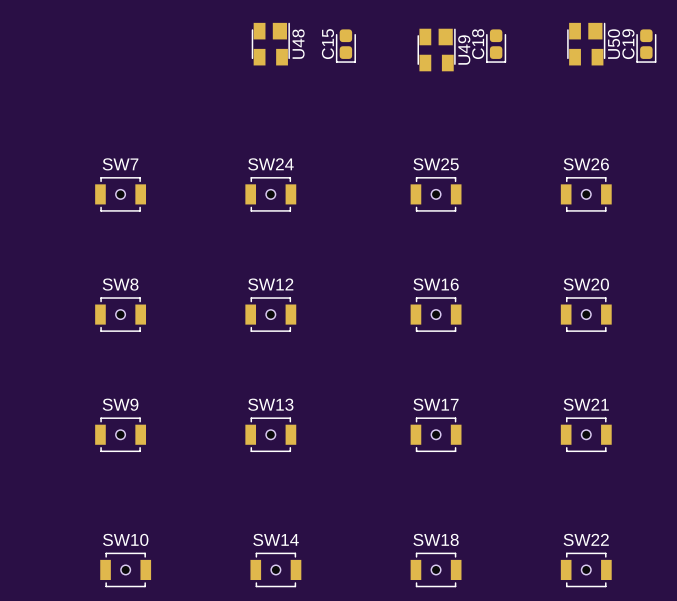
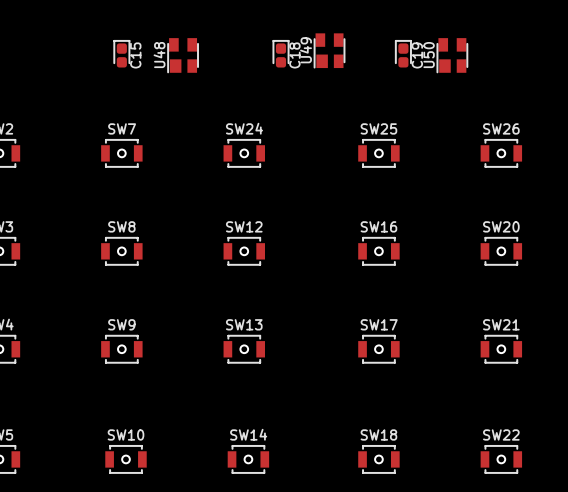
U48 rotation: 0° (270, 44) -> 180° (183, 55)
U48 position: (270, 44) -> (183, 55)
U50 rotation: 0° (586, 44) -> 180° (452, 55)
U50 position: (586, 44) -> (452, 55)
C15 rotation: 0° (345, 46) -> 180° (121, 53)
C15 position: (345, 46) -> (121, 53)
C18 rotation: 0° (496, 46) -> 180° (281, 53)
C18 position: (496, 46) -> (281, 53)
C19 rotation: 0° (646, 46) -> 180° (403, 53)
C19 position: (646, 46) -> (403, 53)
U49 rotation: 0° (436, 49) -> 180° (329, 50)
U49 position: (436, 49) -> (329, 50)

